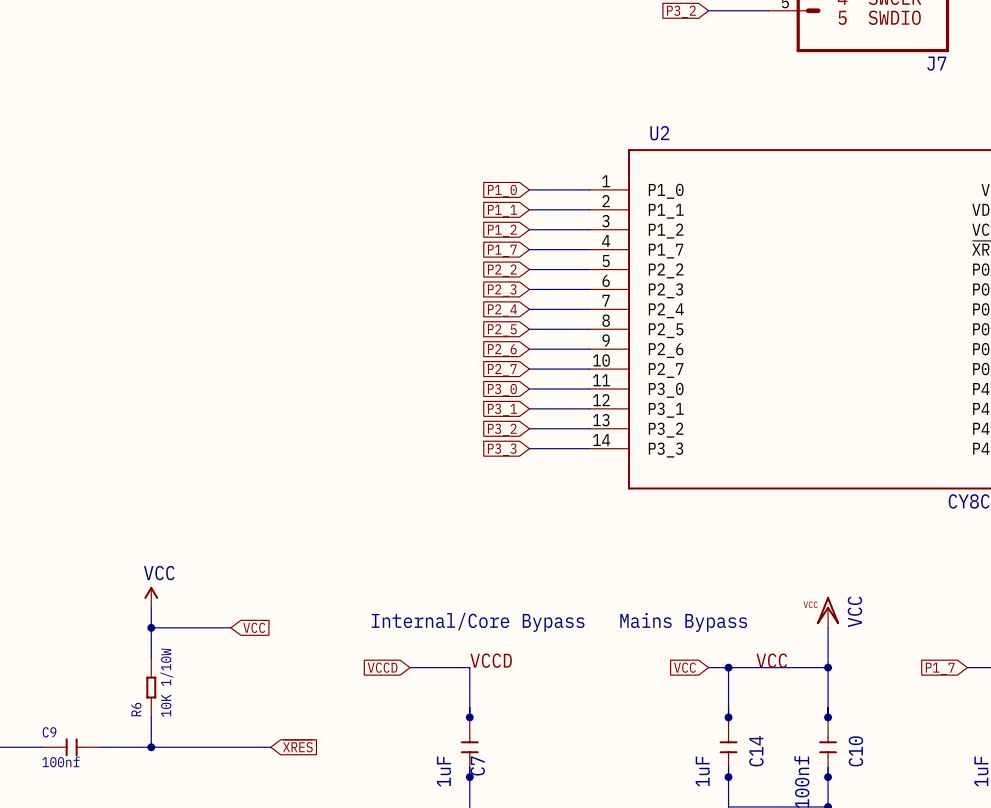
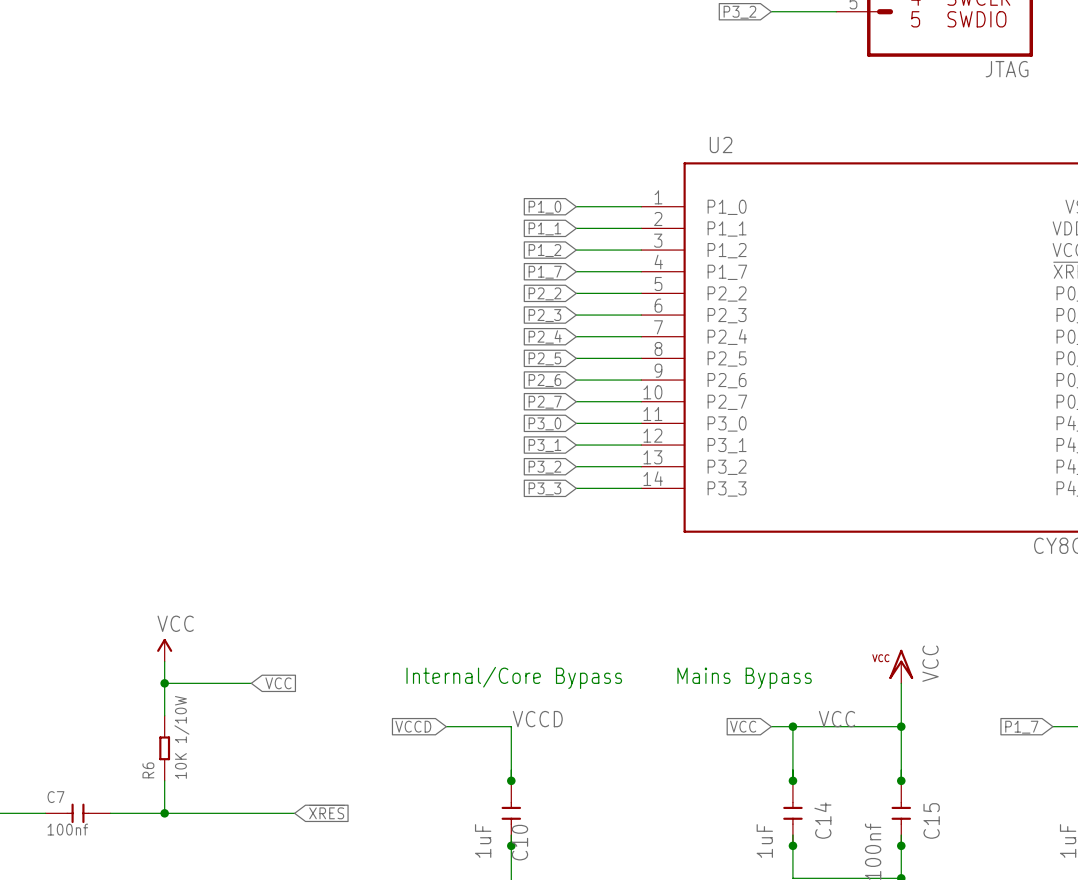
J7 name: J7 (936, 63) -> JTAG (1007, 69)
C9 name: C9 (49, 732) -> C7 (55, 797)
C10 name: C10 (855, 751) -> C15 (931, 820)
C7 name: C7 (477, 766) -> C10 (519, 842)

